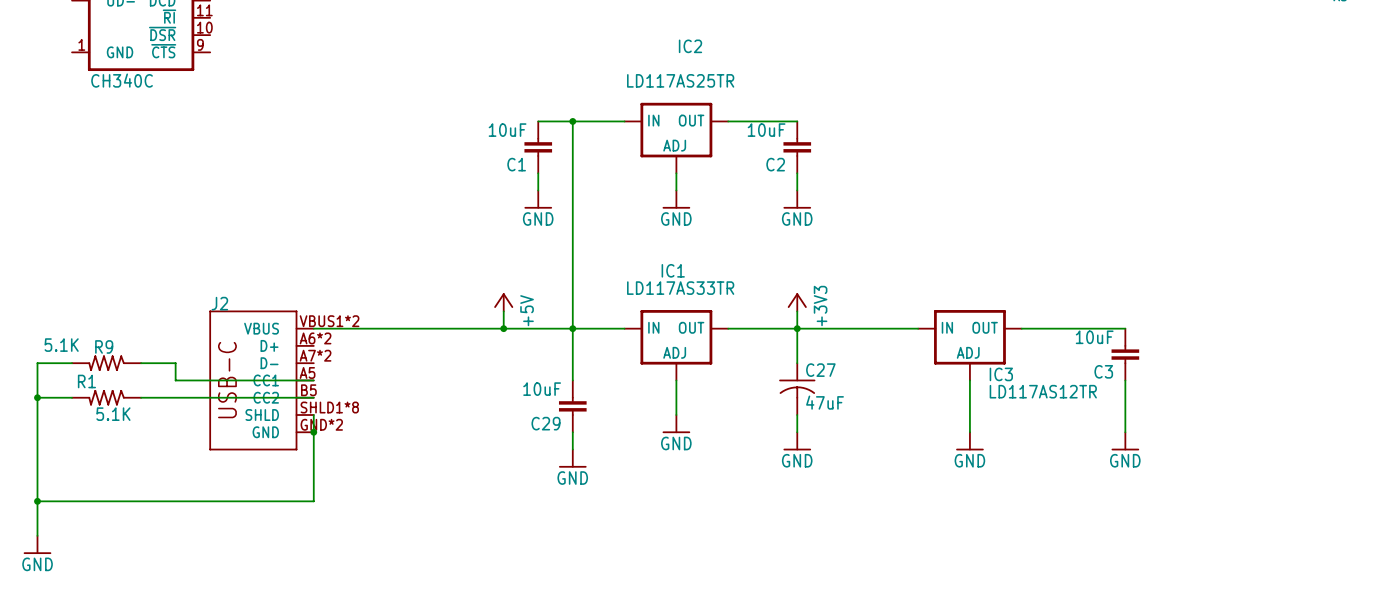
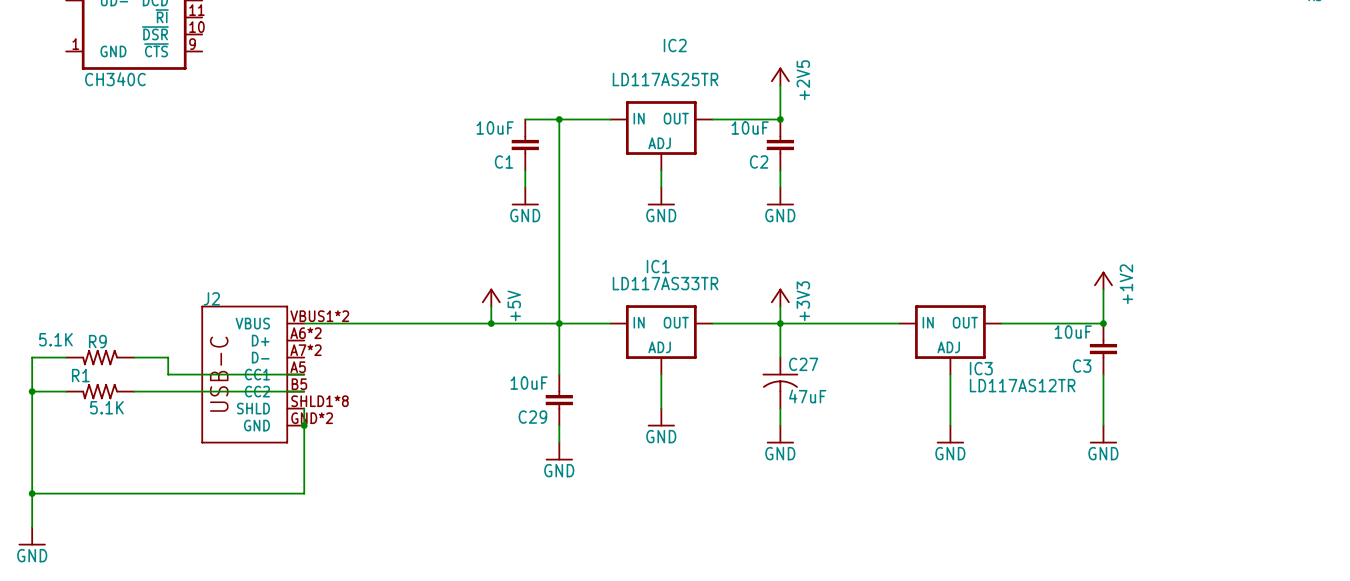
power symbol: none -> +2V5 (780, 76)
wire: none -> (780, 85) (780, 119)
junction: none -> (780, 119)
power symbol: none -> +1V2 (1103, 280)
wire: none -> (1103, 289) (1103, 323)
junction: none -> (1103, 323)

